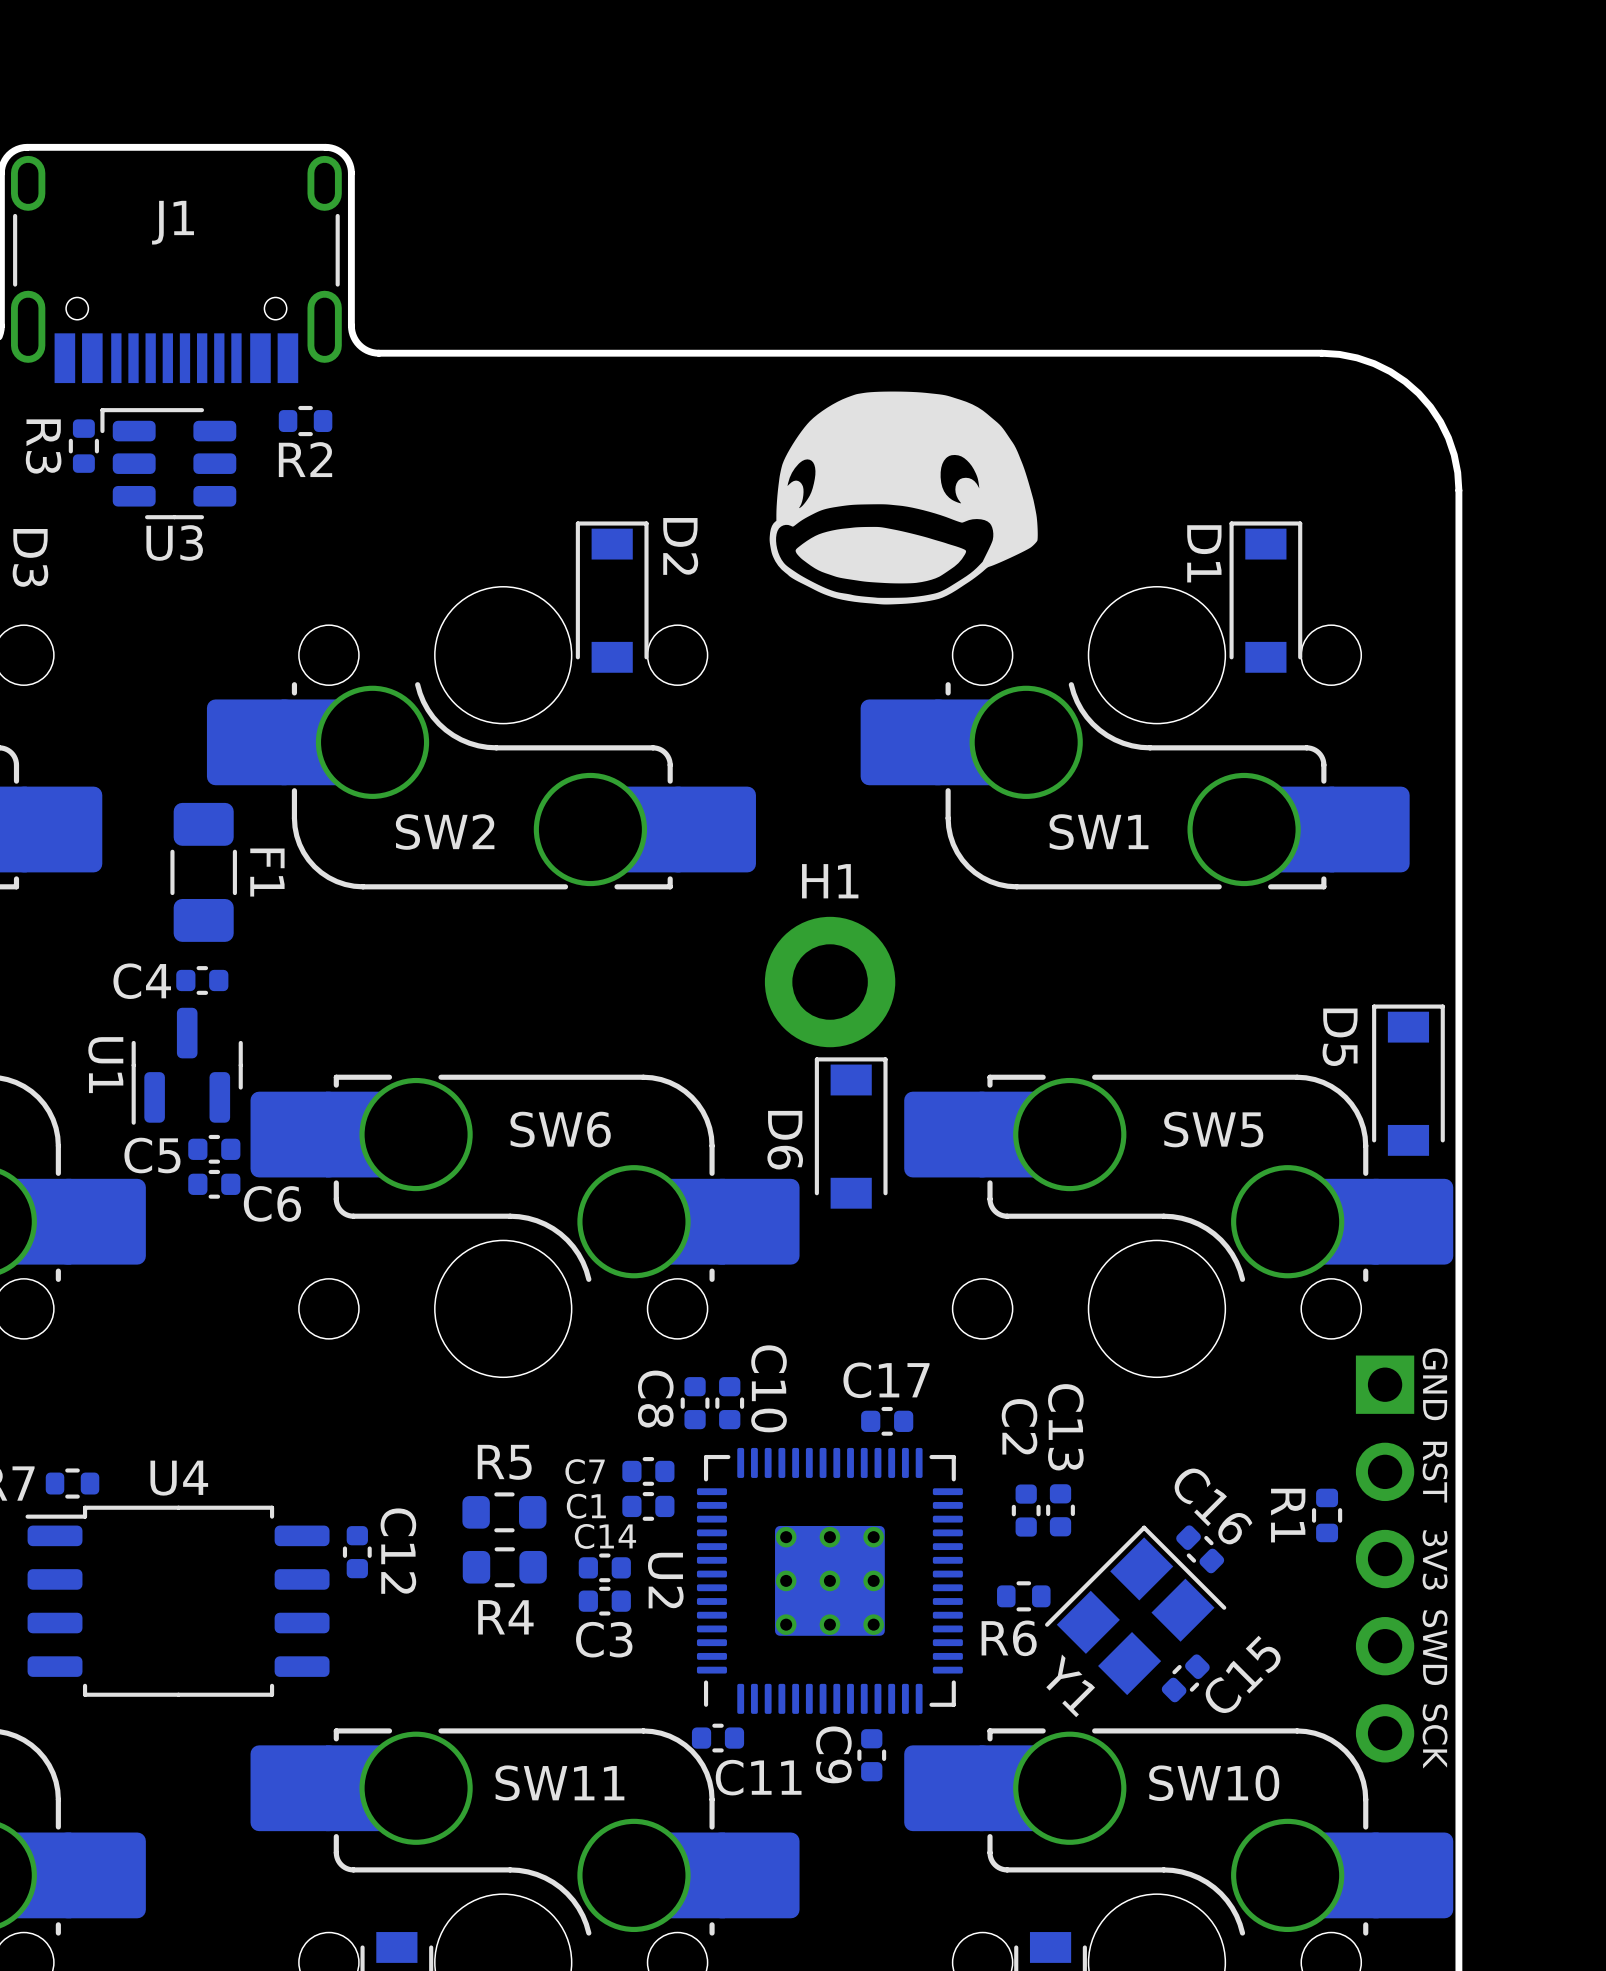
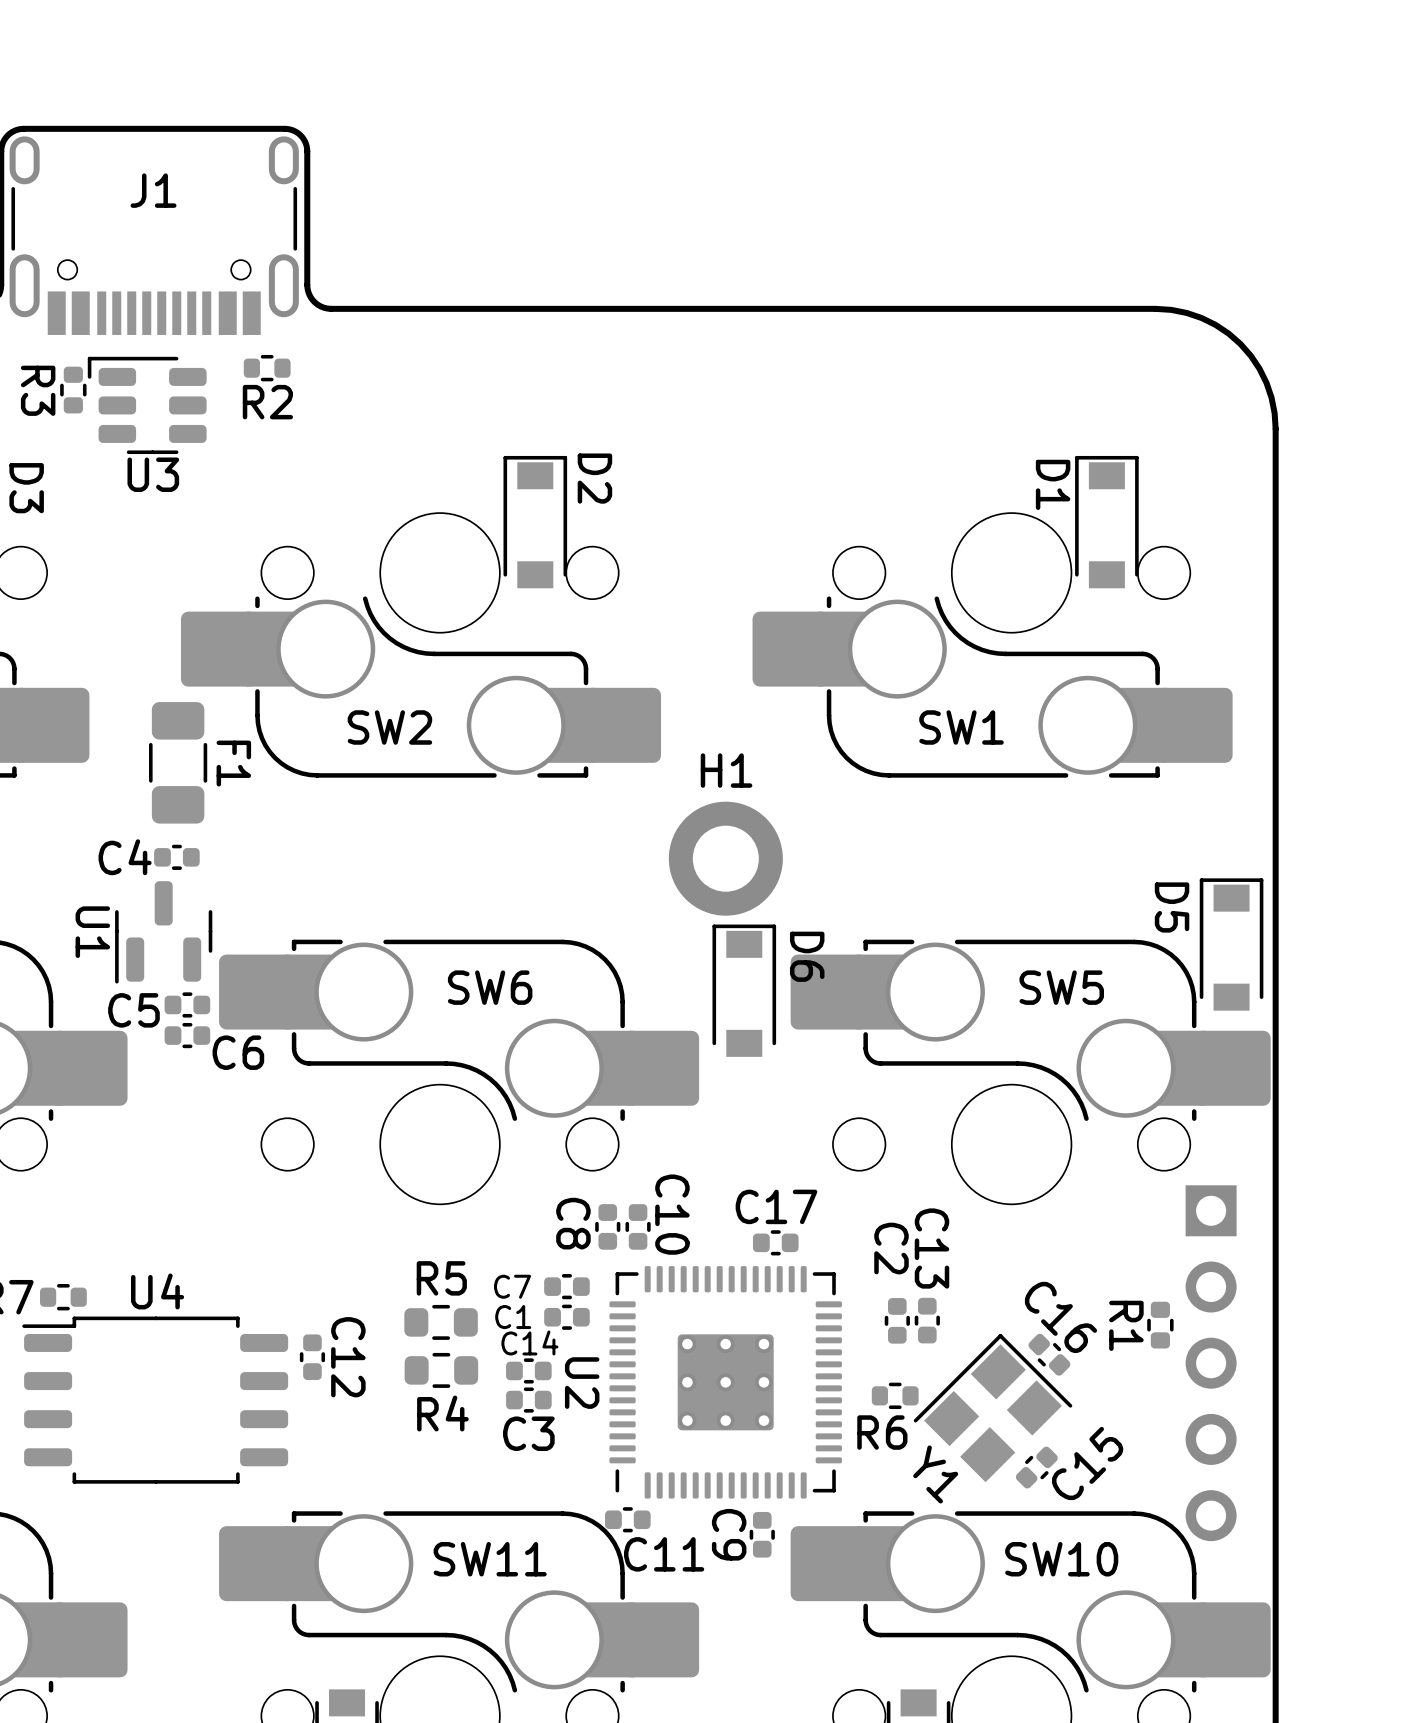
drawing: [769, 391, 1038, 605] -> none
D6 name position: D6 (785, 1140) -> D6 (807, 956)
text: GND (1435, 1384) -> none
text: RST (1435, 1472) -> none
text: 3V3 (1435, 1559) -> none
text: SWD (1435, 1647) -> none
text: SCK (1435, 1736) -> none

